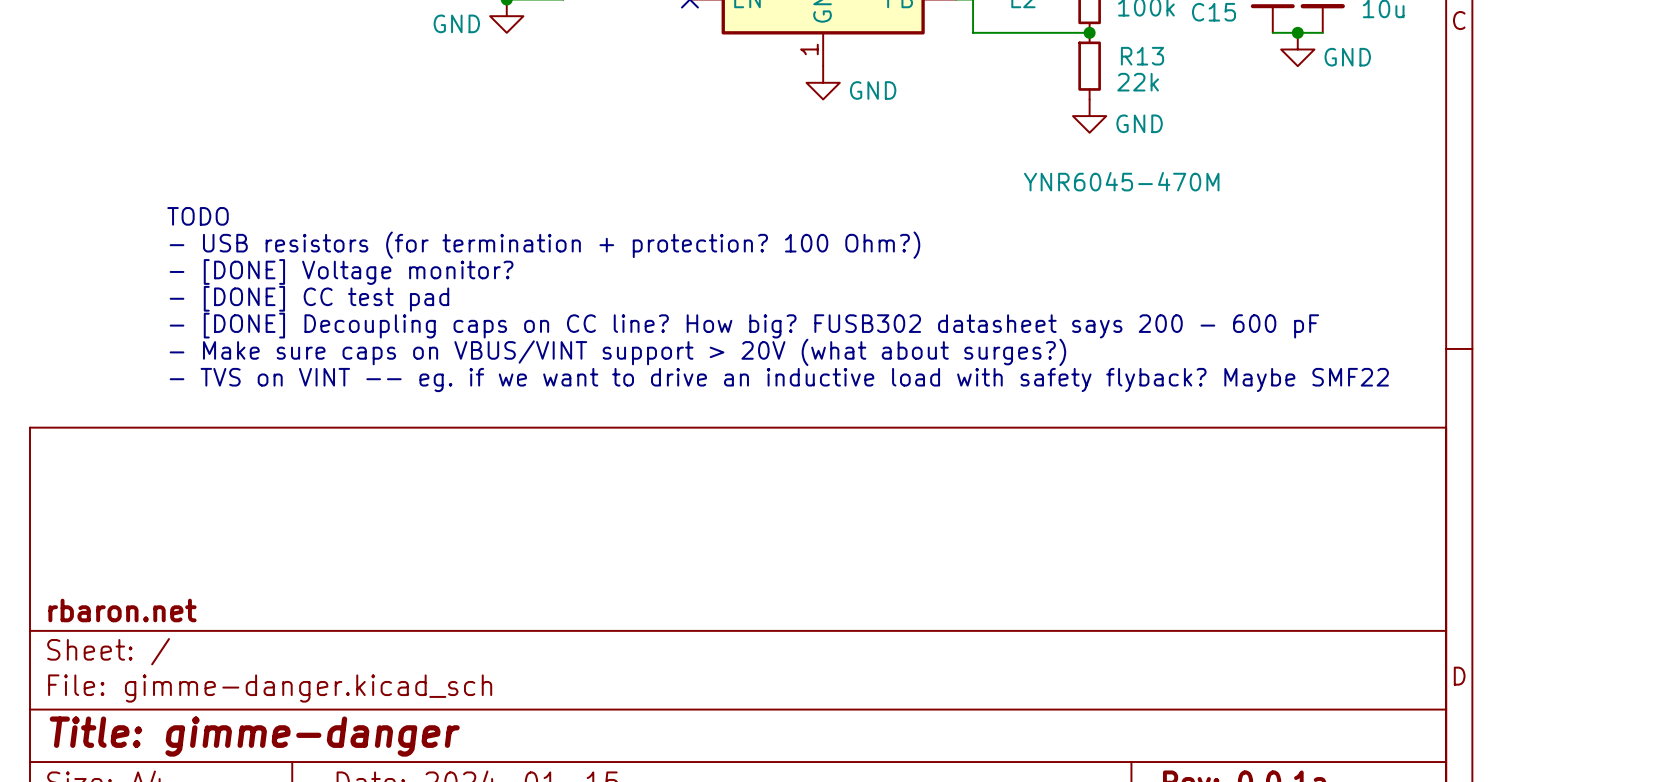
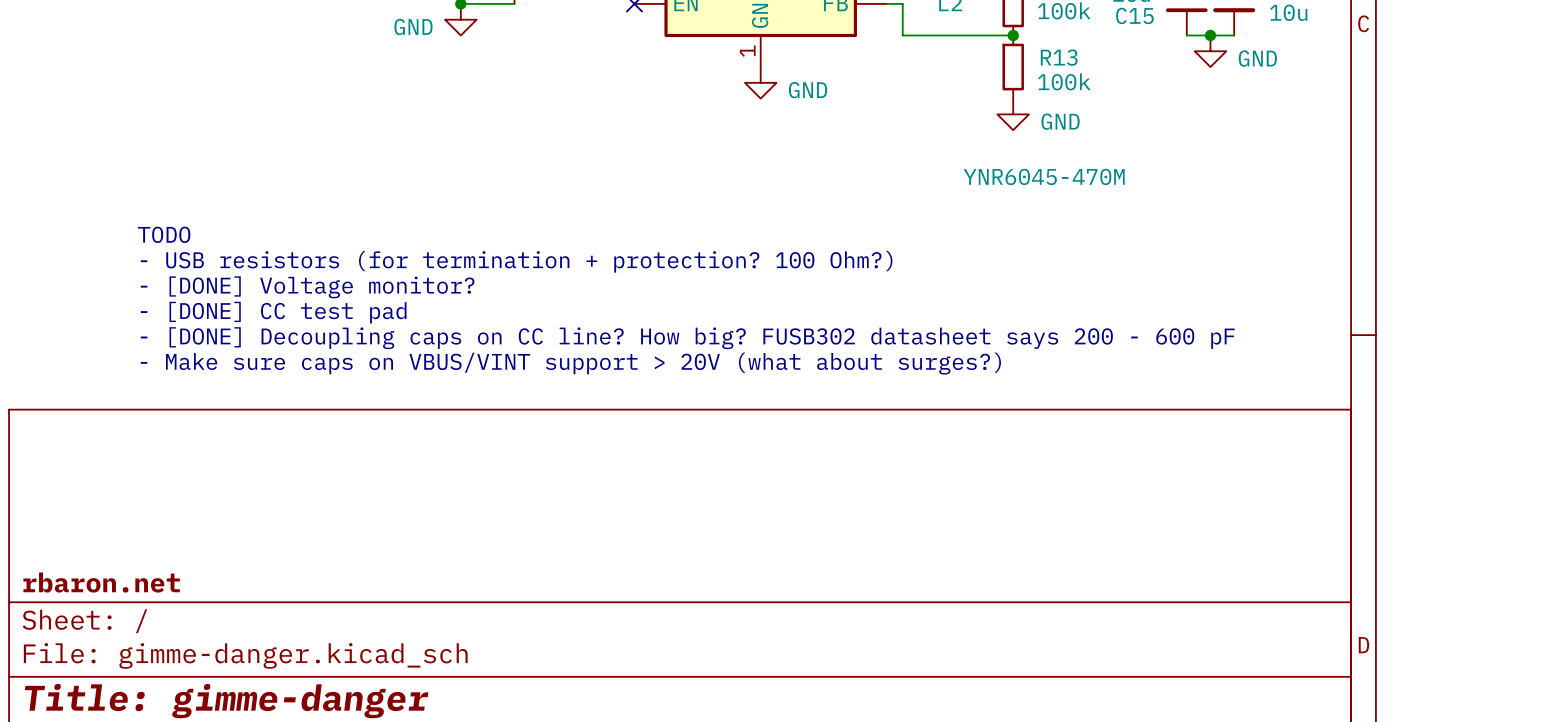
R13 value: 22k (1138, 82) -> 100k (1064, 81)
text: TODO (198, 216) -> none
text: - USB resistors (for termination + protection? 100 Ohm?) (544, 245) -> TODO (164, 234)
text: - [DONE] Voltage monitor? (341, 271) -> - USB resistors (for termination + protection? 100 Ohm?) (516, 261)
text: - [DONE] CC test pad (309, 298) -> - [DONE] Voltage monitor? (307, 287)
text: - [DONE] Decoupling caps on CC line? How big? FUSB302 datasheet says 200 - 600 pF (744, 325) -> - [DONE] CC test pad (273, 312)
text: - Make sure caps on VBUS/VINT support > 20V (what about surges?) (617, 352) -> - [DONE] Decoupling caps on CC line? How big? FUSB302 datasheet says 200 - 600 pF (687, 338)
text: - TVS on VINT -- eg. if we want to drive an inductive load with safety flyback? Maybe SMF22 (779, 380) -> - Make sure caps on VBUS/VINT support > 20V (what about surges?) (570, 363)

